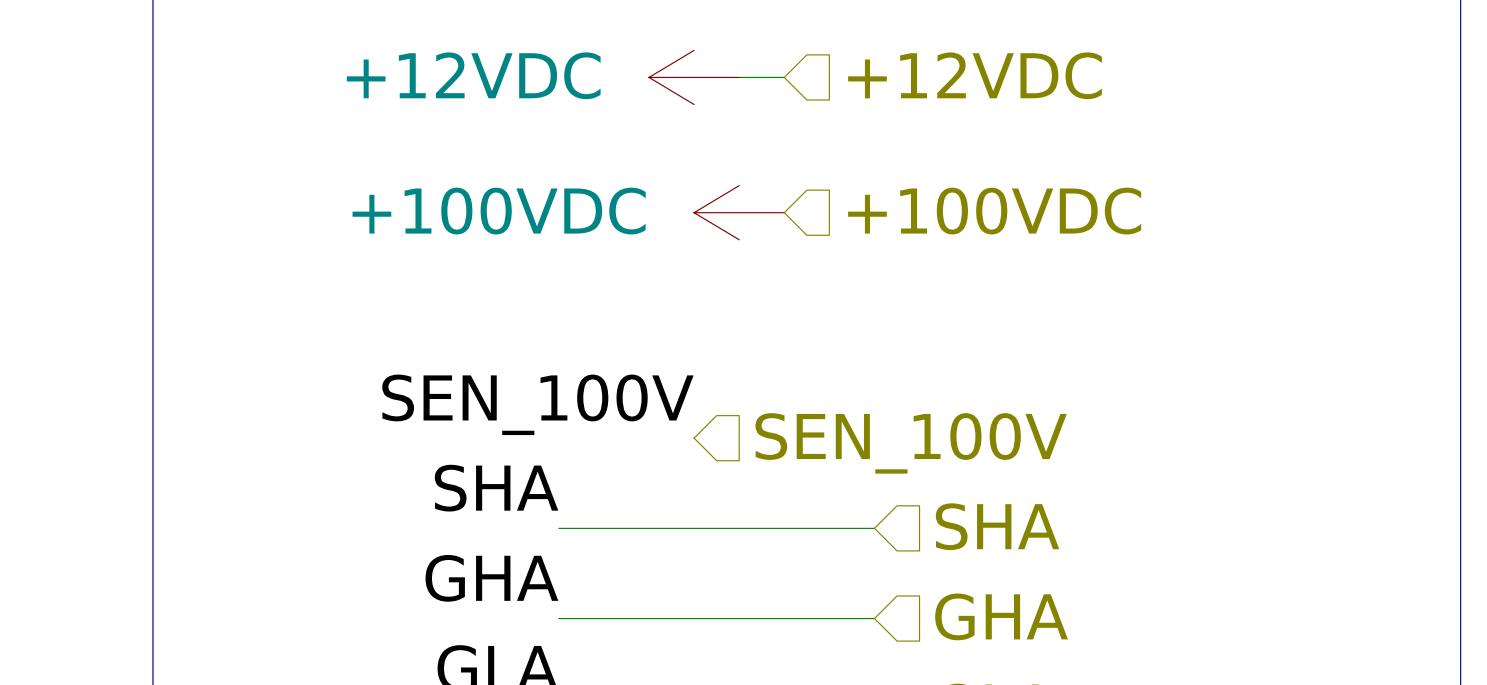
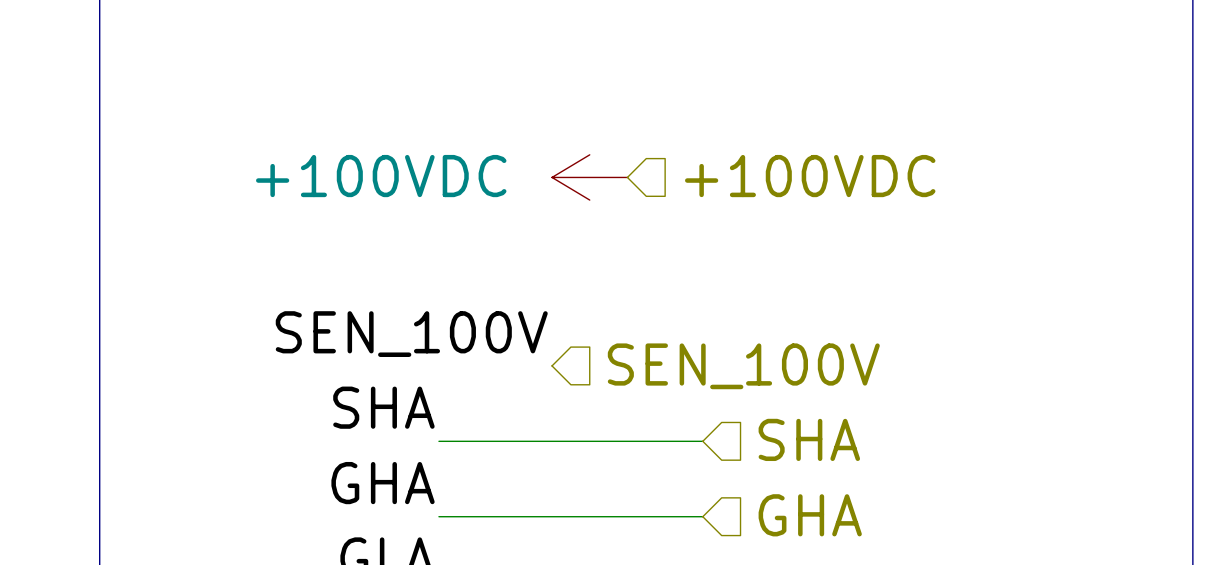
hierarchical label: +12VDC (974, 75) -> none
power symbol: +12VDC (694, 77) -> none
wire: (739, 77) (784, 77) -> none

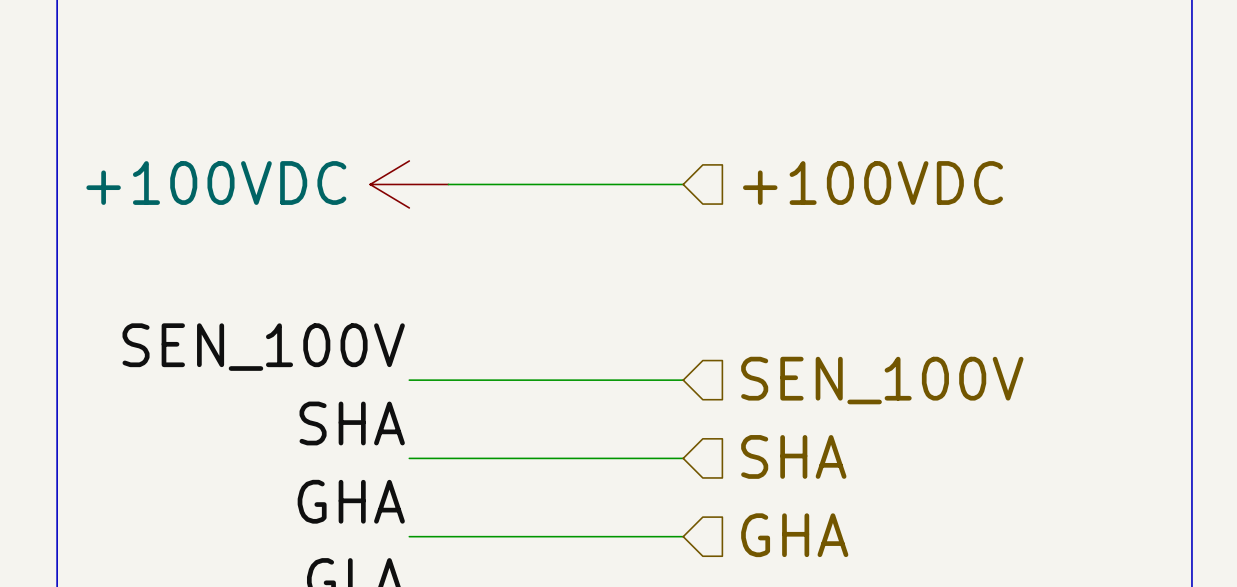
power symbol text position: +100VDC (381, 176) -> +100VDC (216, 183)
hierarchical label position: +100VDC (810, 176) -> +100VDC (873, 183)
wire: none -> (448, 184) (683, 184)
power symbol position: +100VDC (589, 177) -> +100VDC (409, 184)
label position: SEN_100V (411, 334) -> SEN_100V (263, 347)
wire: none -> (409, 380) (683, 380)
hierarchical label position: SEN_100V (743, 366) -> SEN_100V (882, 380)

